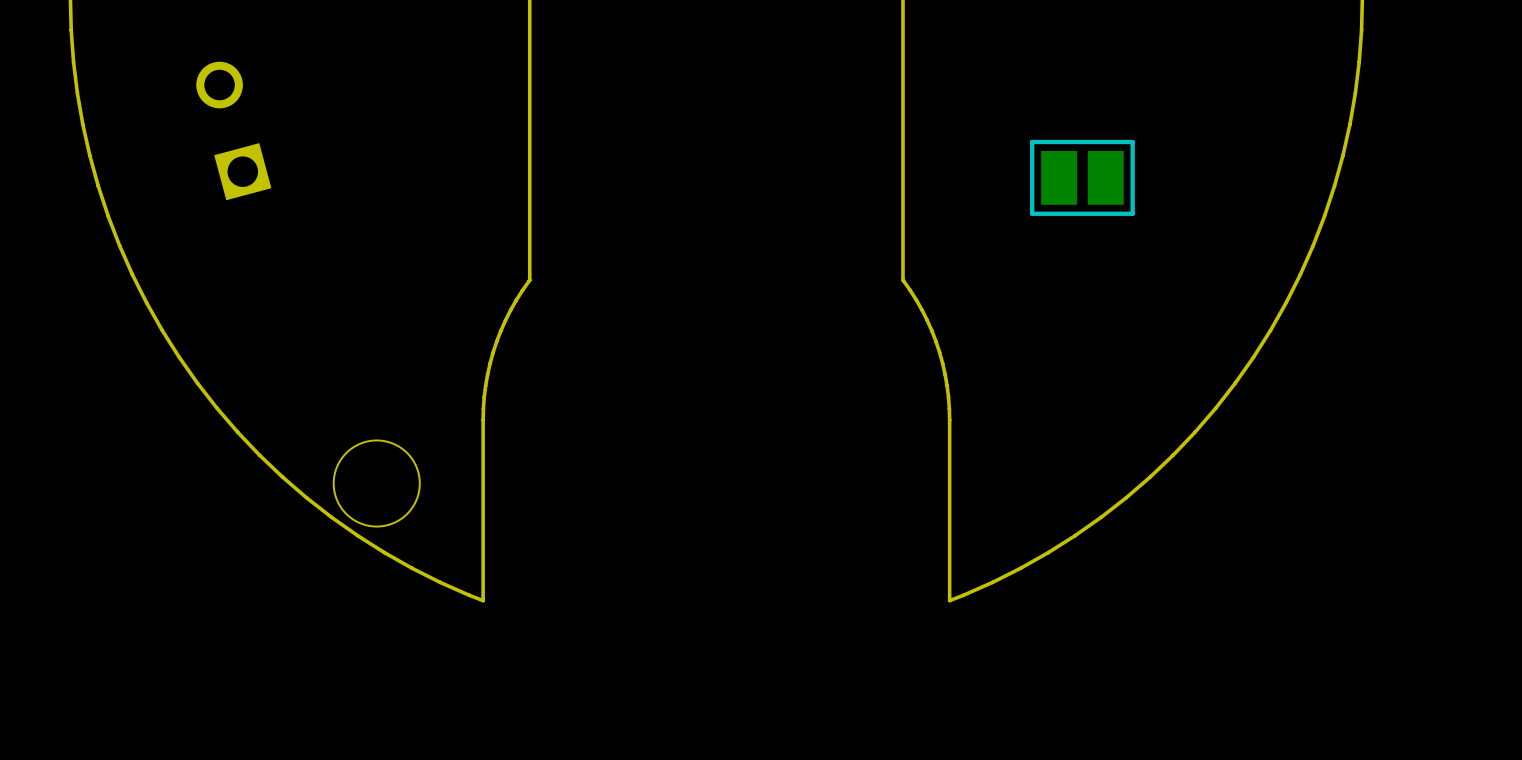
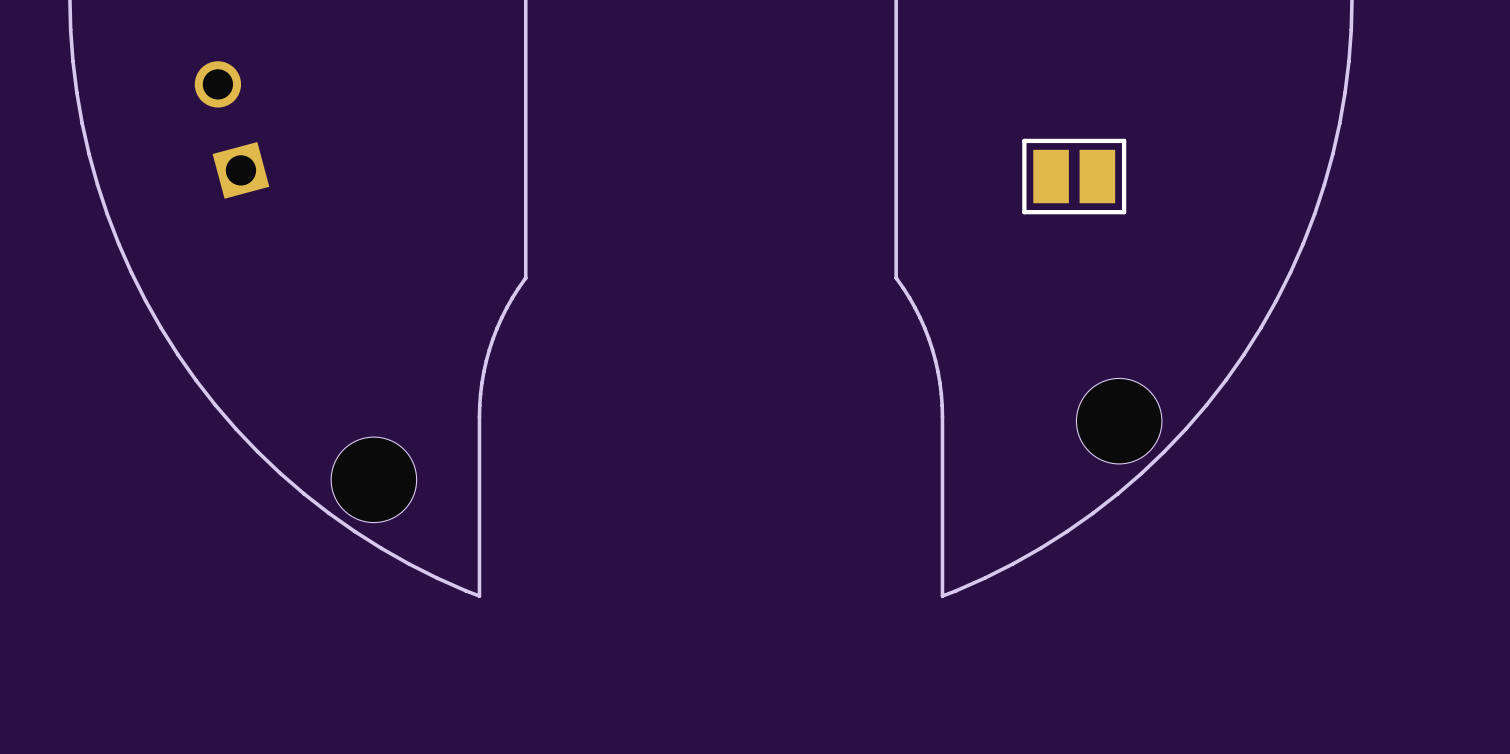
part: none -> (1119, 421)

